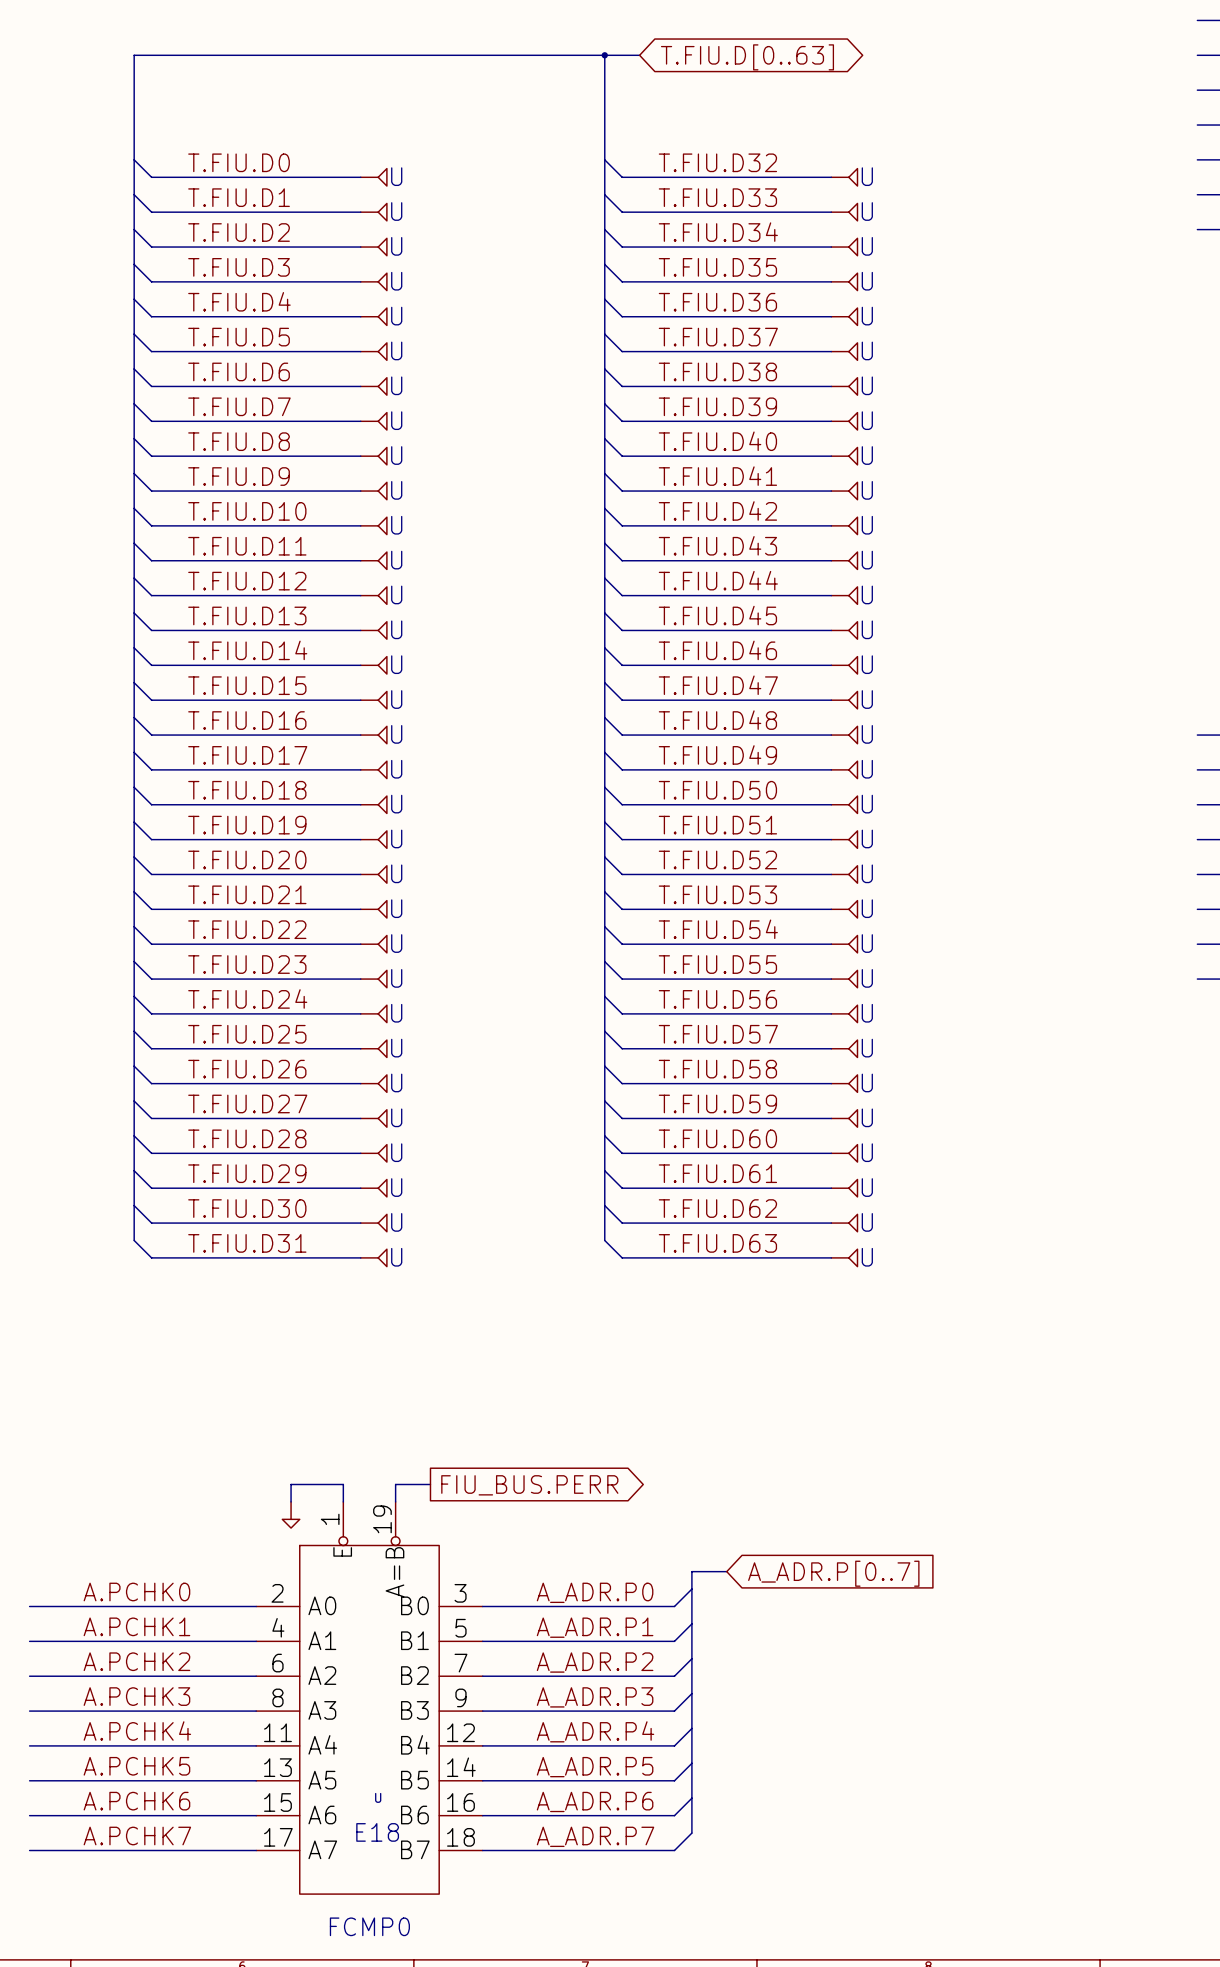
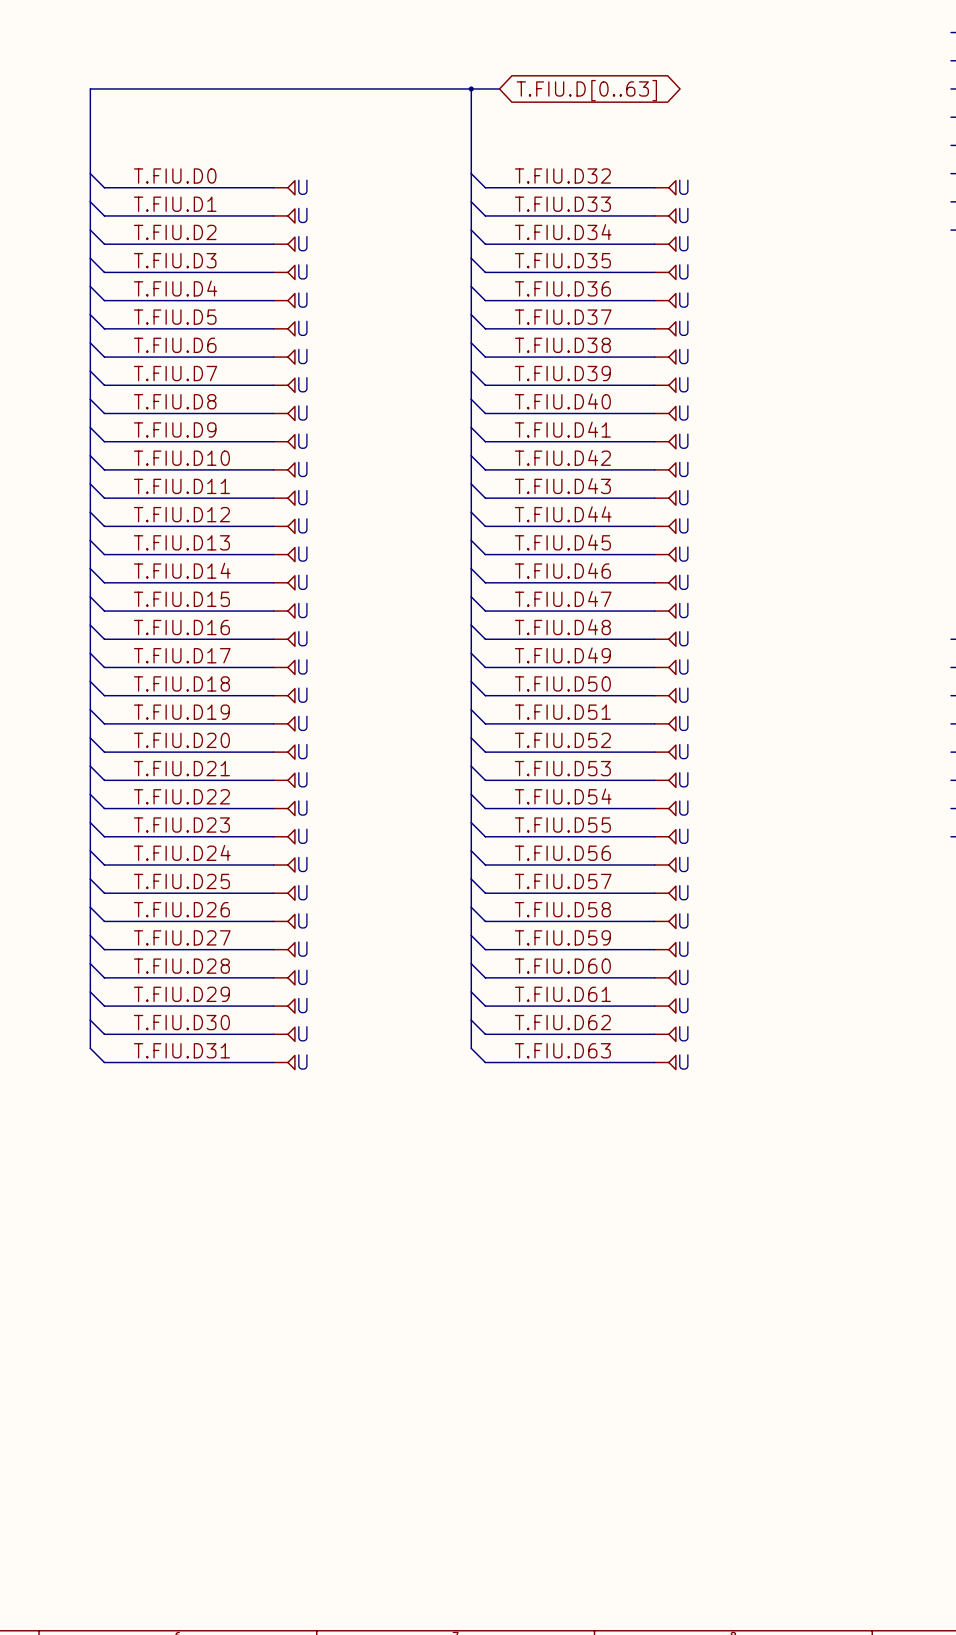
wire: (430, 1484) (395, 1484) (395, 1501) -> none
global label: FIU_BUS.PERR (529, 1485) -> none
wire: (291, 1501) (291, 1484) (343, 1484) (343, 1501) -> none
power symbol: (291, 1515) -> none
bus: (726, 1571) (691, 1571) (691, 1833) -> none
global label: A_ADR.P[0..7] (833, 1573) -> none
wire: (691, 1589) (674, 1606) (482, 1606) -> none
label: A.PCHK0 (136, 1591) -> none
label: A_ADR.P0 (595, 1592) -> none
wire: (29, 1606) (256, 1606) -> none
wire: (691, 1623) (674, 1641) (482, 1641) -> none
label: A.PCHK1 (136, 1626) -> none
label: A_ADR.P1 (595, 1627) -> none
wire: (29, 1641) (256, 1641) -> none
wire: (691, 1658) (674, 1676) (482, 1676) -> none
label: A.PCHK2 (136, 1661) -> none
label: A_ADR.P2 (595, 1662) -> none
wire: (29, 1676) (256, 1676) -> none
wire: (691, 1693) (674, 1711) (482, 1711) -> none
label: A.PCHK3 (136, 1696) -> none
label: A_ADR.P3 (595, 1697) -> none
U: (369, 1698) -> none
wire: (29, 1711) (256, 1711) -> none
wire: (691, 1728) (674, 1745) (482, 1745) -> none
label: A.PCHK4 (137, 1731) -> none
label: A_ADR.P4 (595, 1731) -> none
wire: (29, 1745) (256, 1745) -> none
wire: (691, 1763) (674, 1780) (482, 1780) -> none
label: A.PCHK5 (136, 1766) -> none
label: A_ADR.P5 (595, 1767) -> none
wire: (29, 1780) (256, 1780) -> none
wire: (691, 1798) (674, 1815) (482, 1815) -> none
label: A.PCHK6 (136, 1801) -> none
label: A_ADR.P6 (595, 1801) -> none
wire: (29, 1815) (256, 1815) -> none
wire: (691, 1833) (674, 1850) (482, 1850) -> none
label: A.PCHK7 (137, 1836) -> none
label: A_ADR.P7 (595, 1836) -> none
wire: (29, 1850) (256, 1850) -> none

